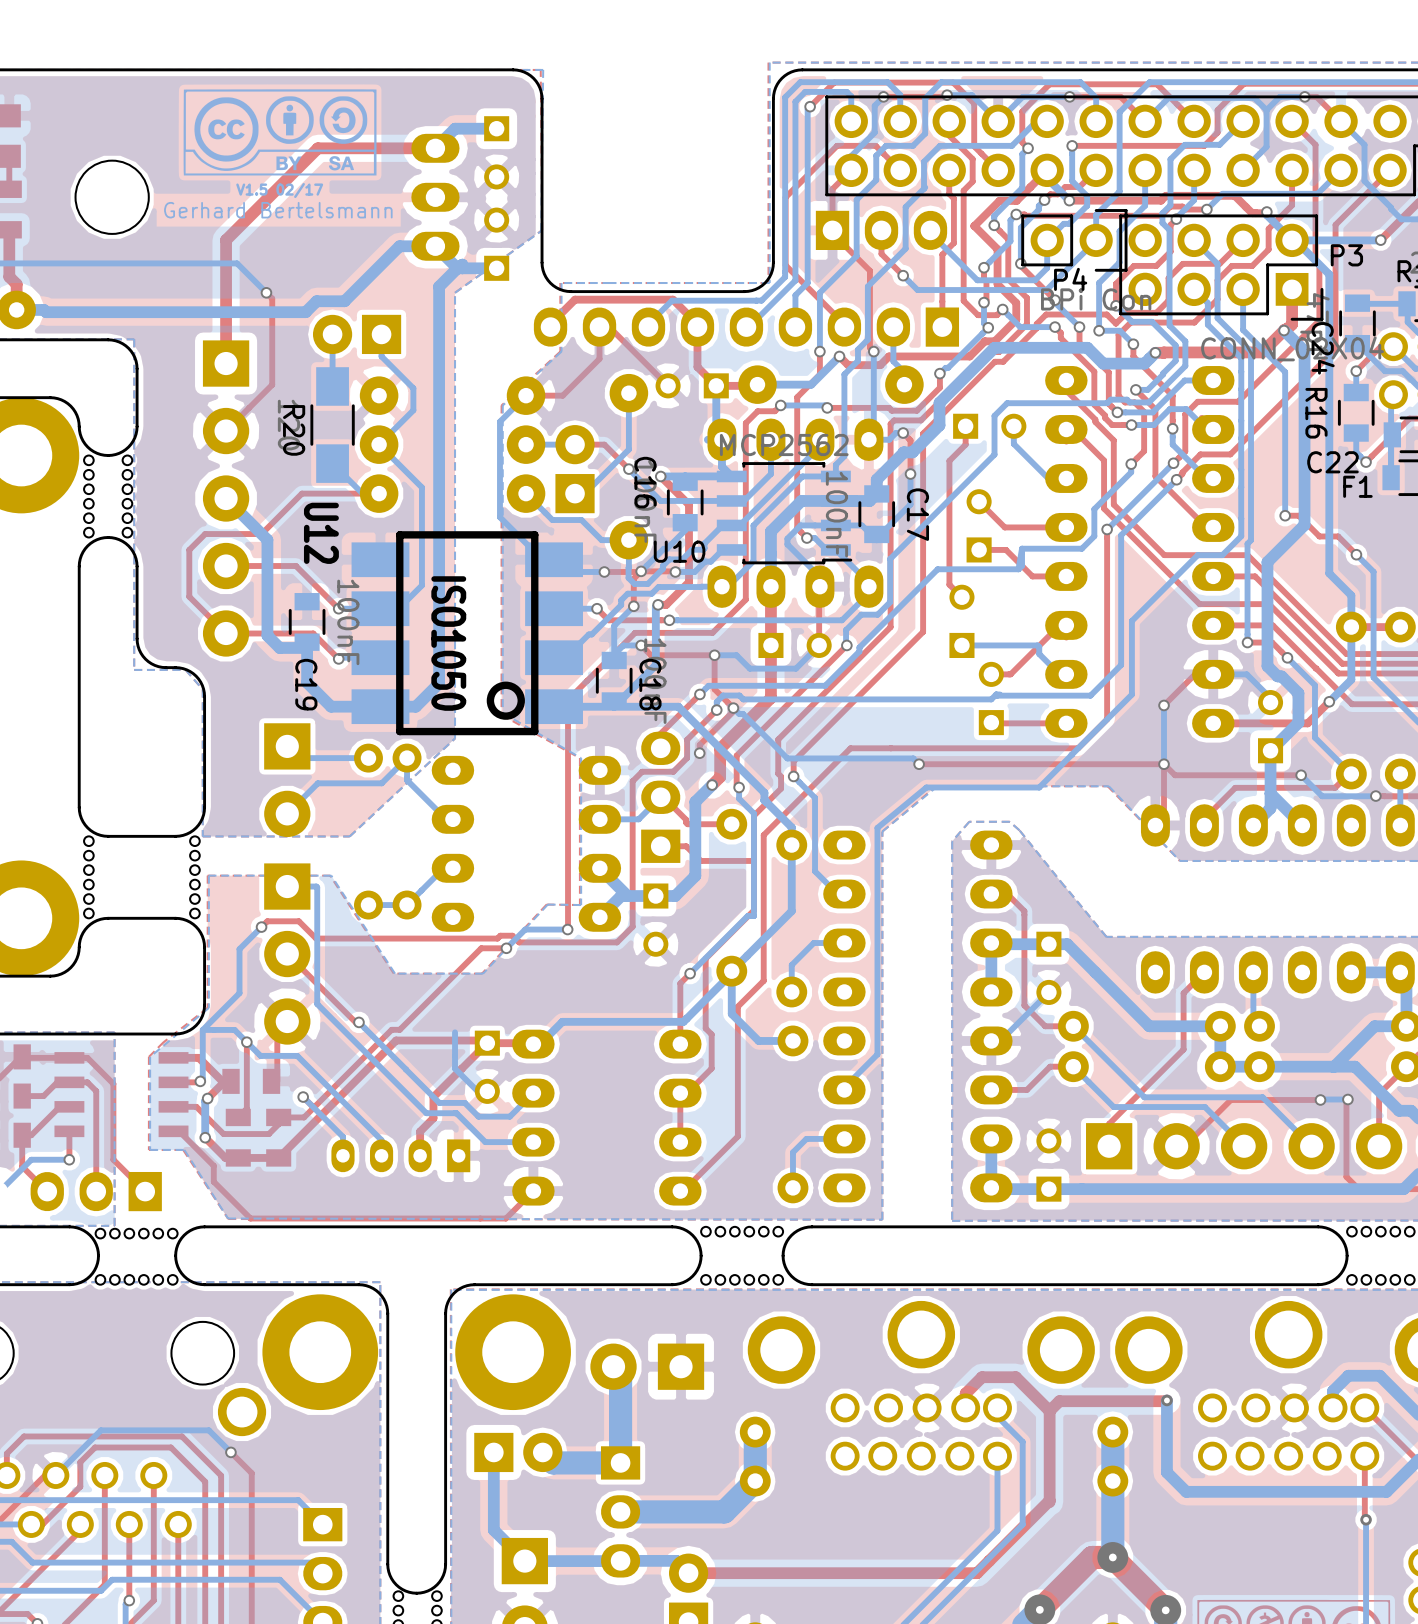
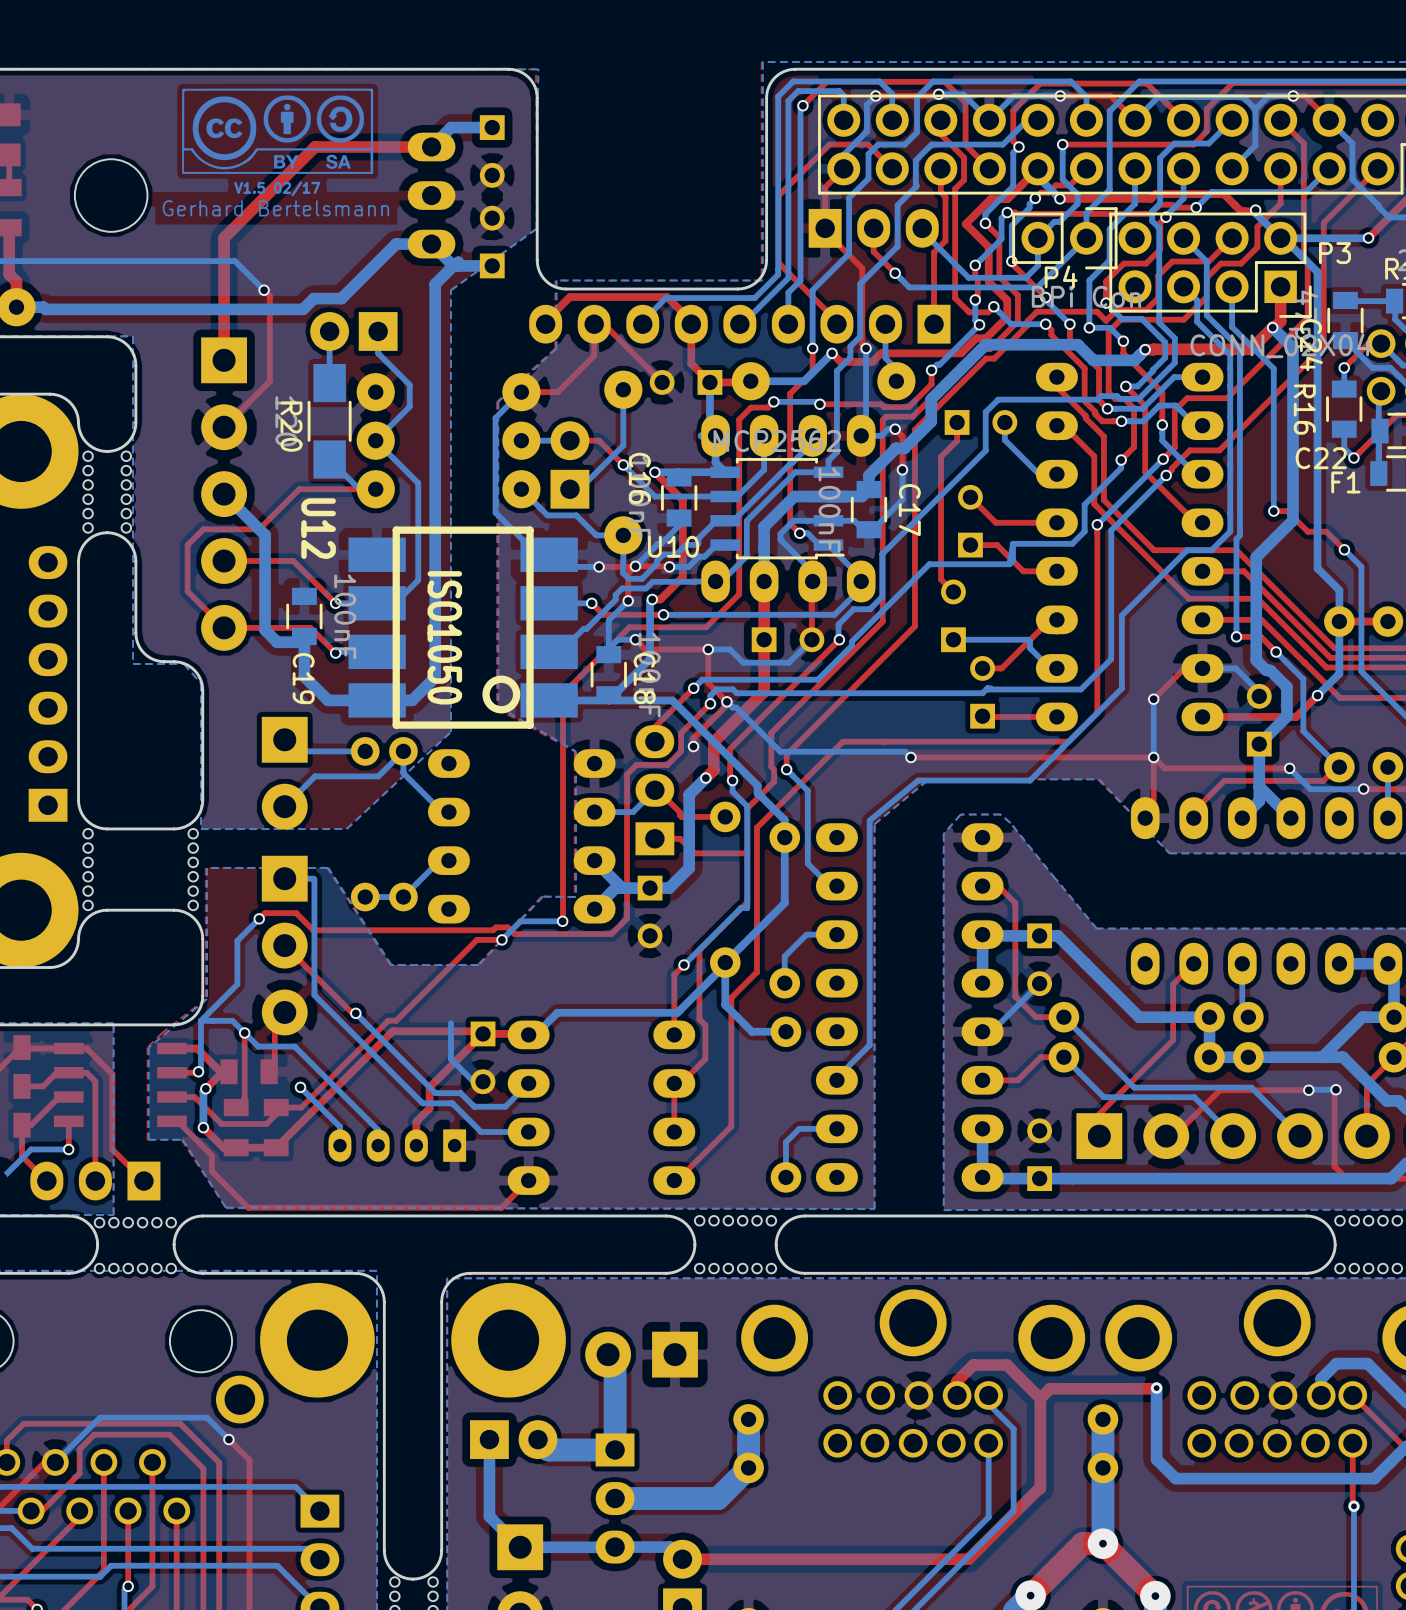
part: none -> (48, 683)

